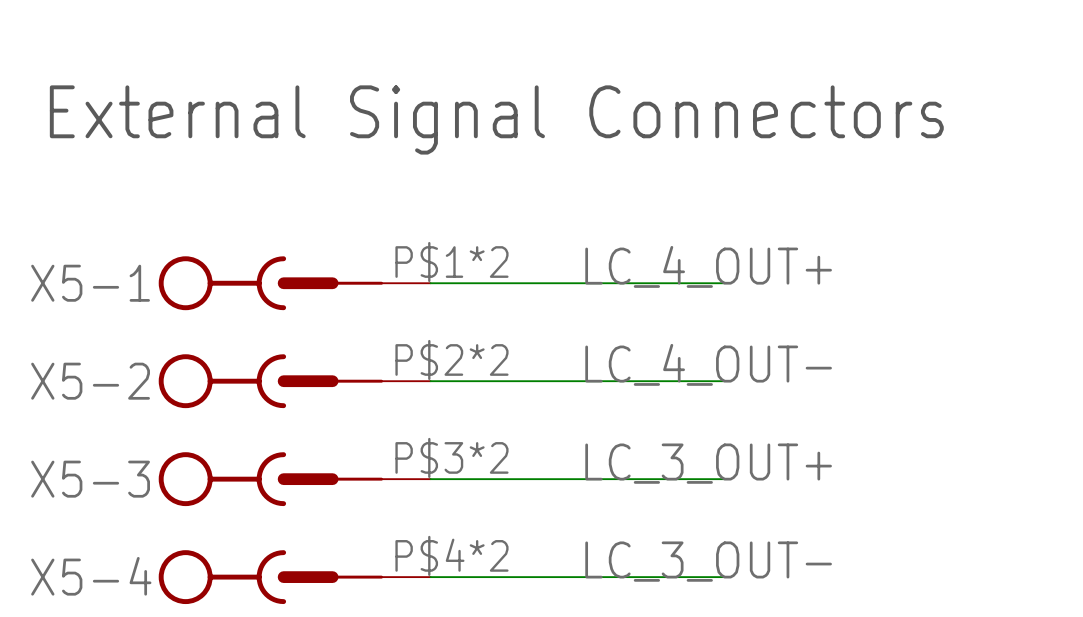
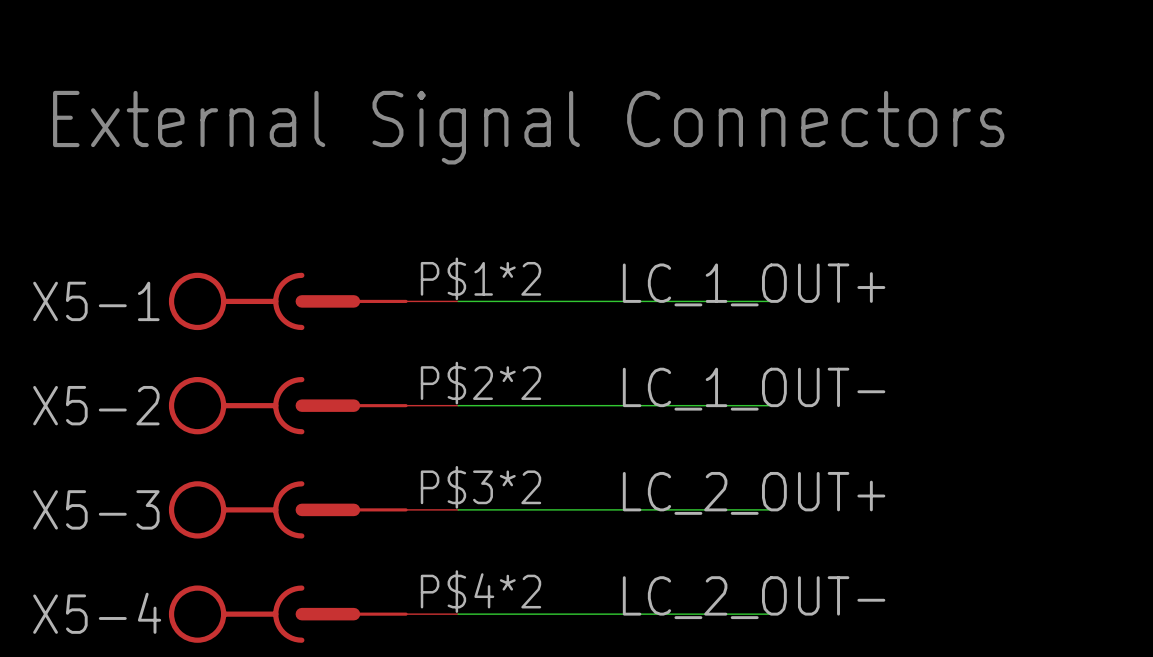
label: LC_4_OUT+ (708, 266) -> LC_1_OUT+ (754, 284)
label: LC_4_OUT- (708, 364) -> LC_1_OUT- (754, 389)
label: LC_3_OUT+ (708, 463) -> LC_2_OUT+ (754, 493)
label: LC_3_OUT- (708, 561) -> LC_2_OUT- (754, 597)

